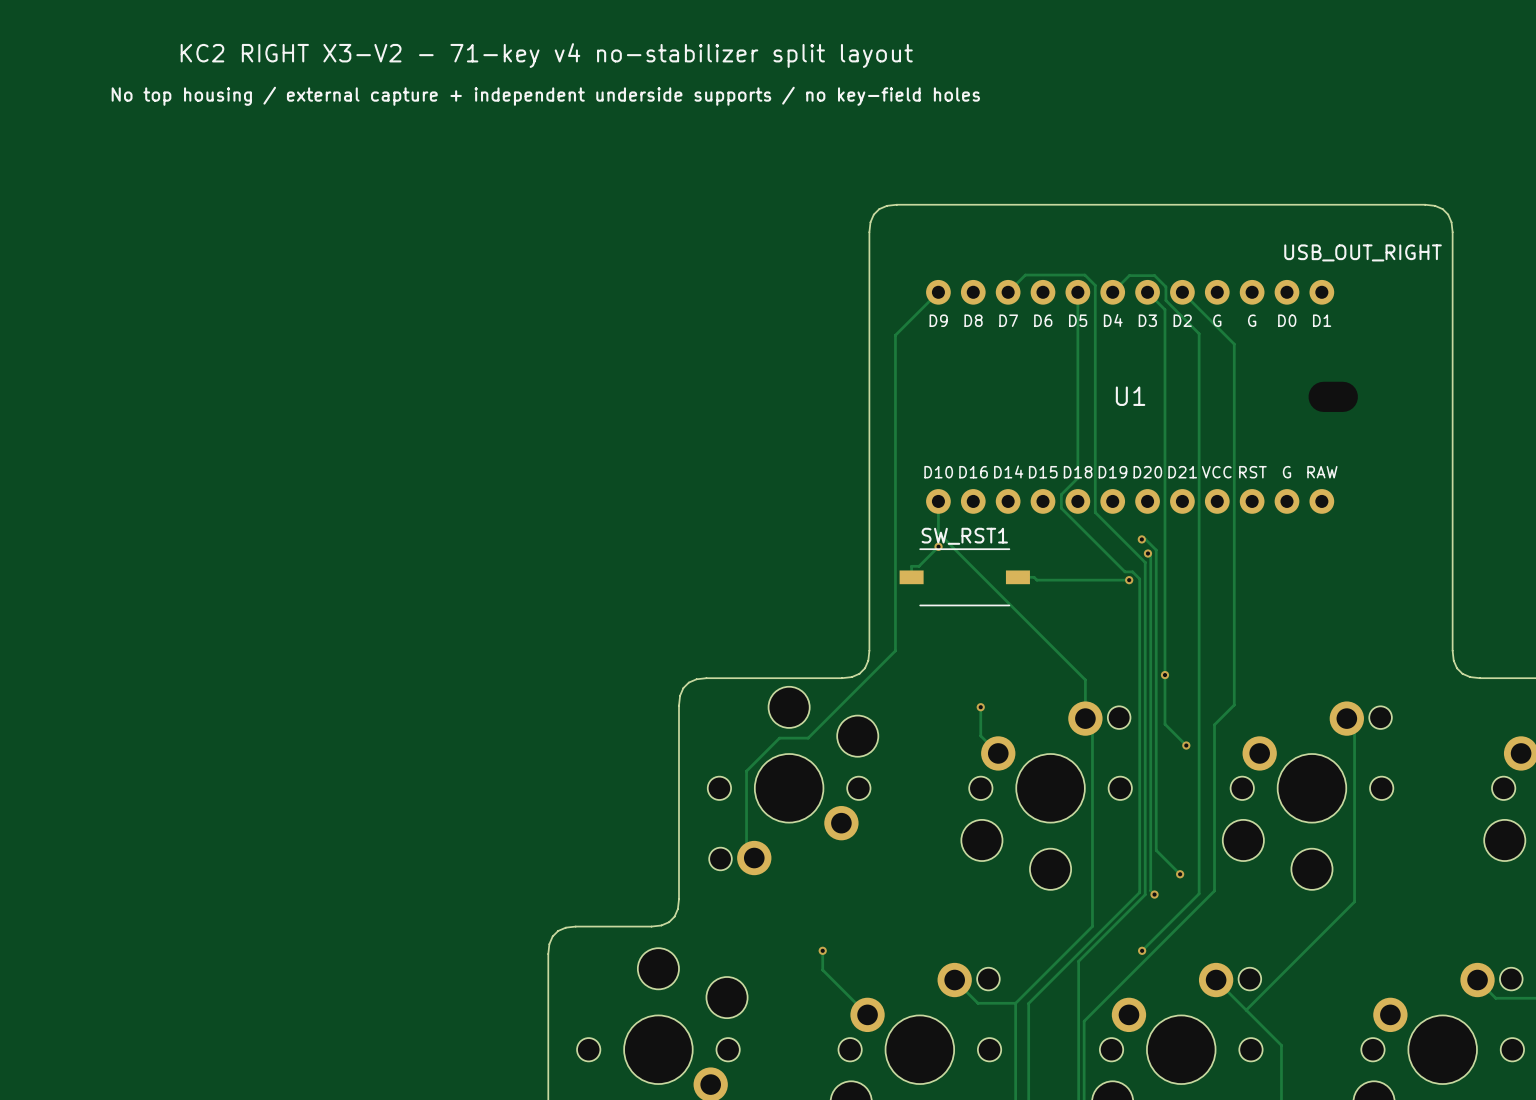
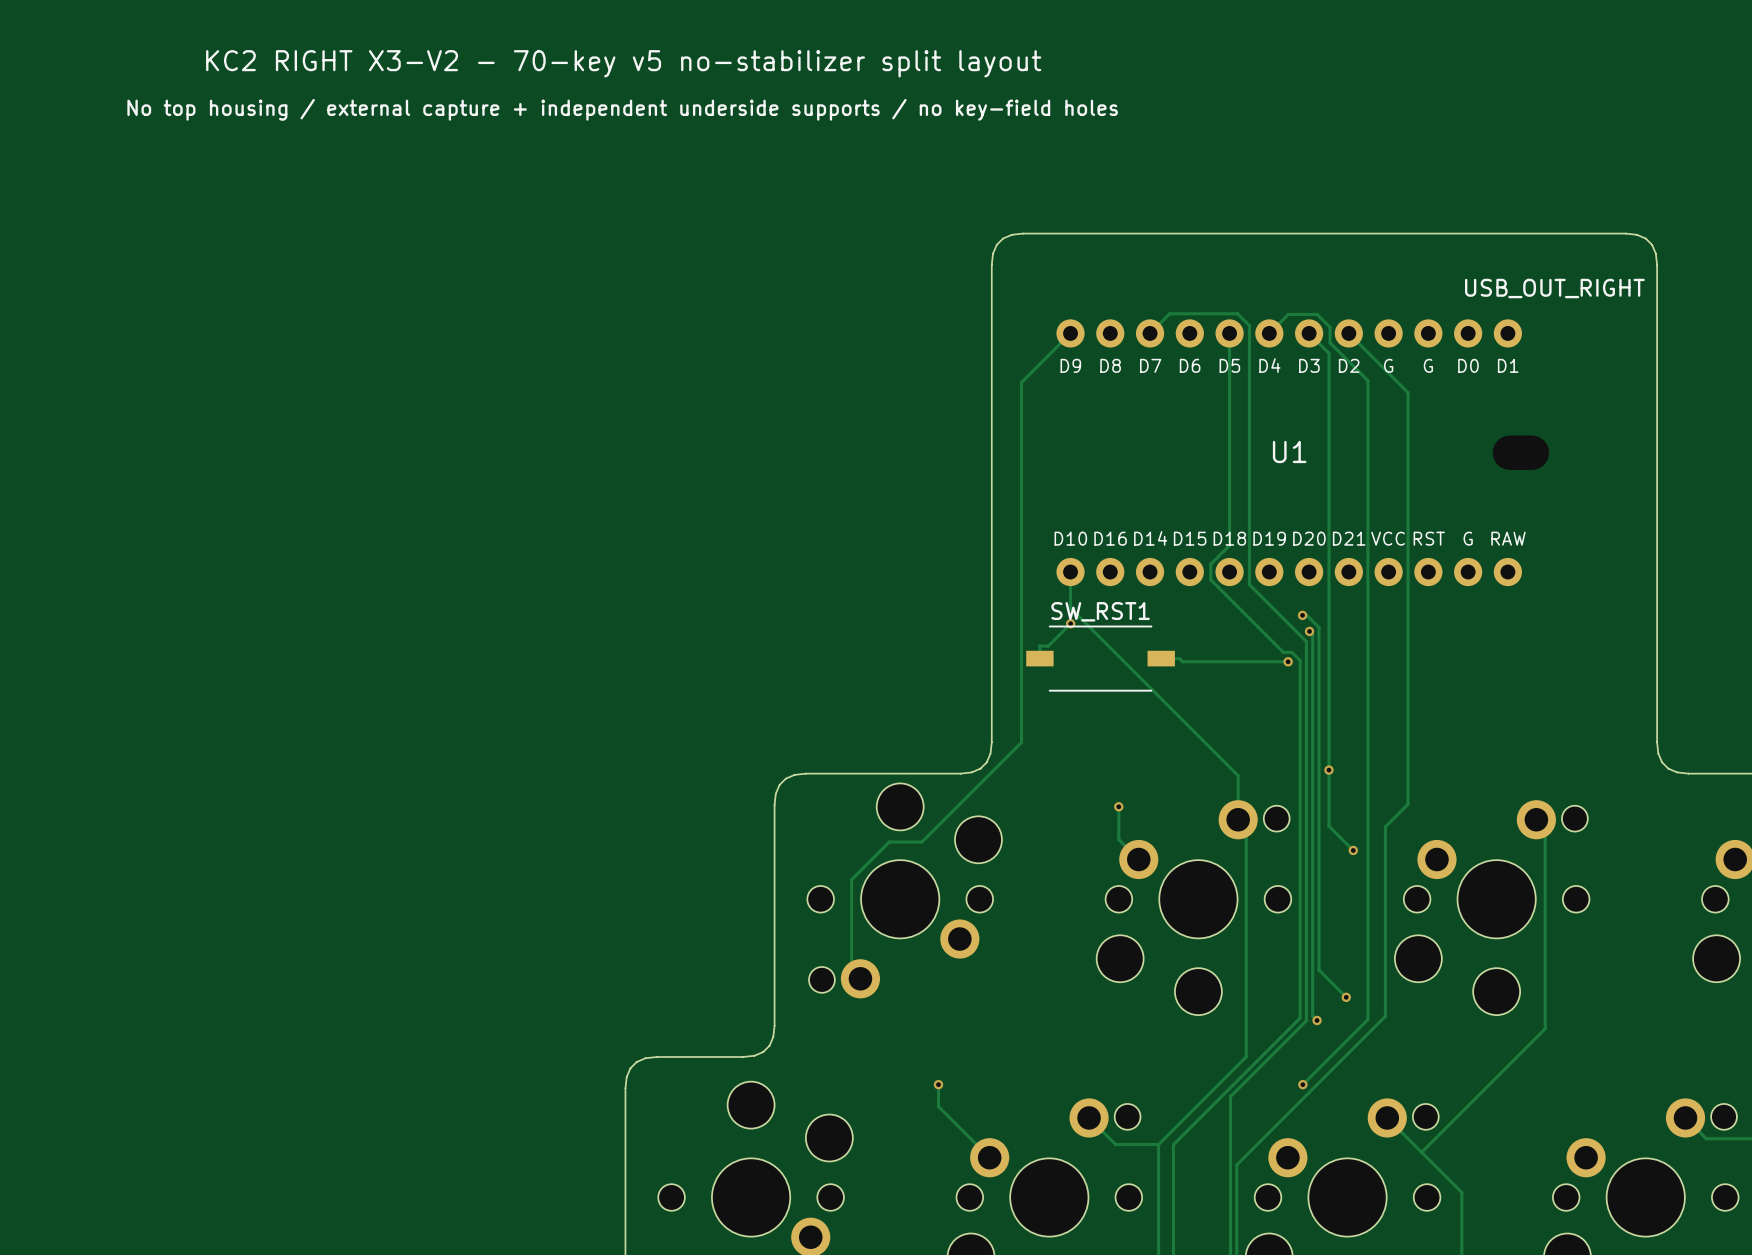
text: KC2 RIGHT X3-V2 - 71-key v4 no-stabilizer split layout (546, 55) -> KC2 RIGHT X3-V2 - 70-key v5 no-stabilizer split layout (623, 63)

